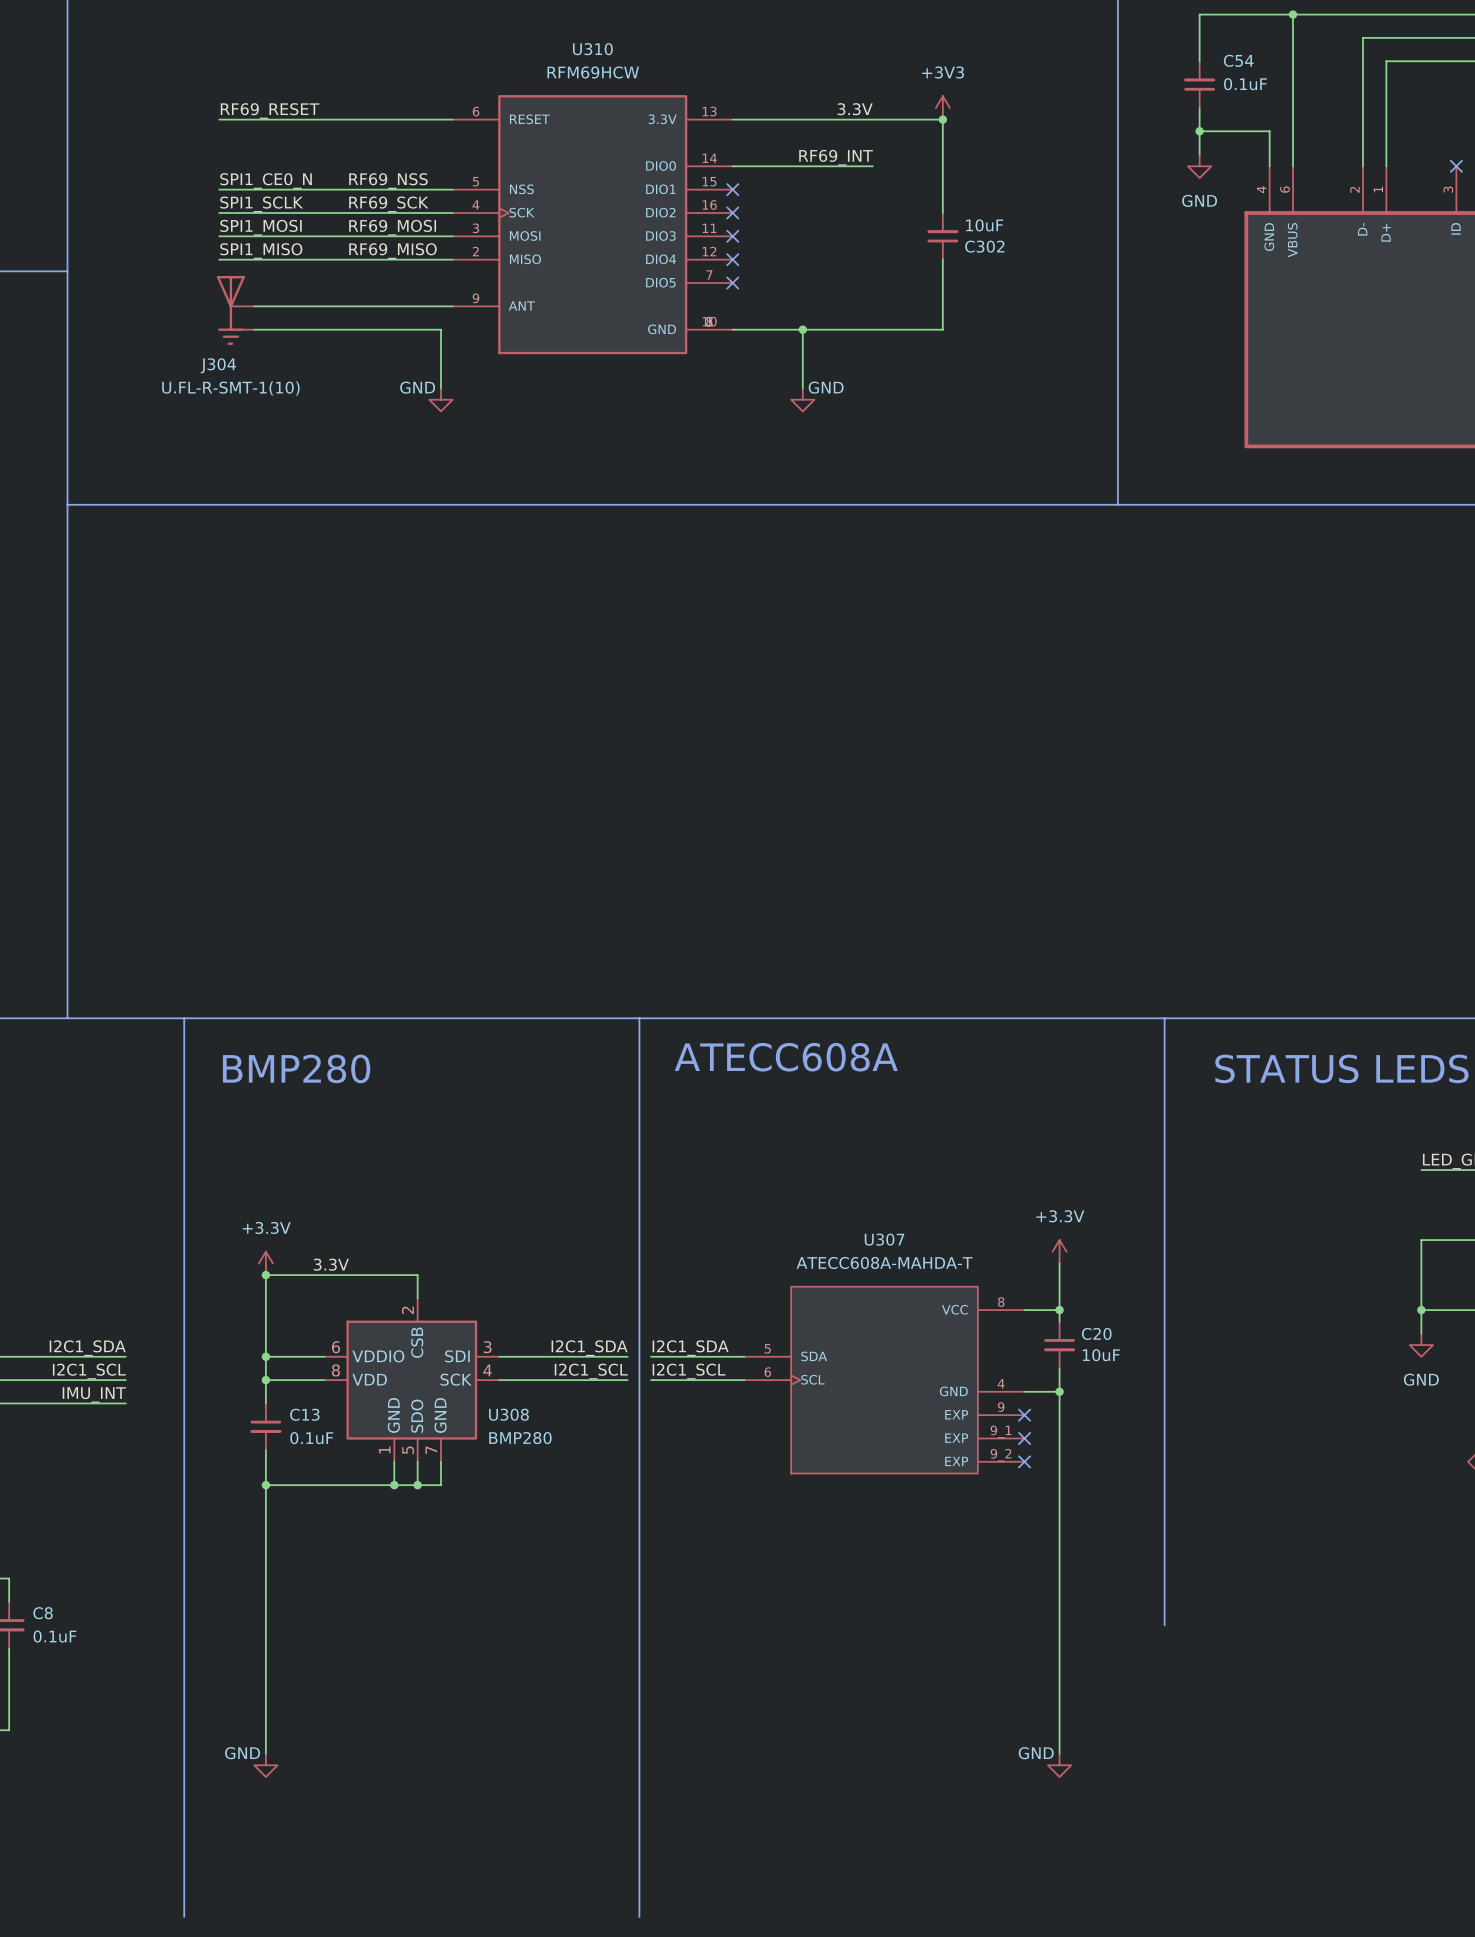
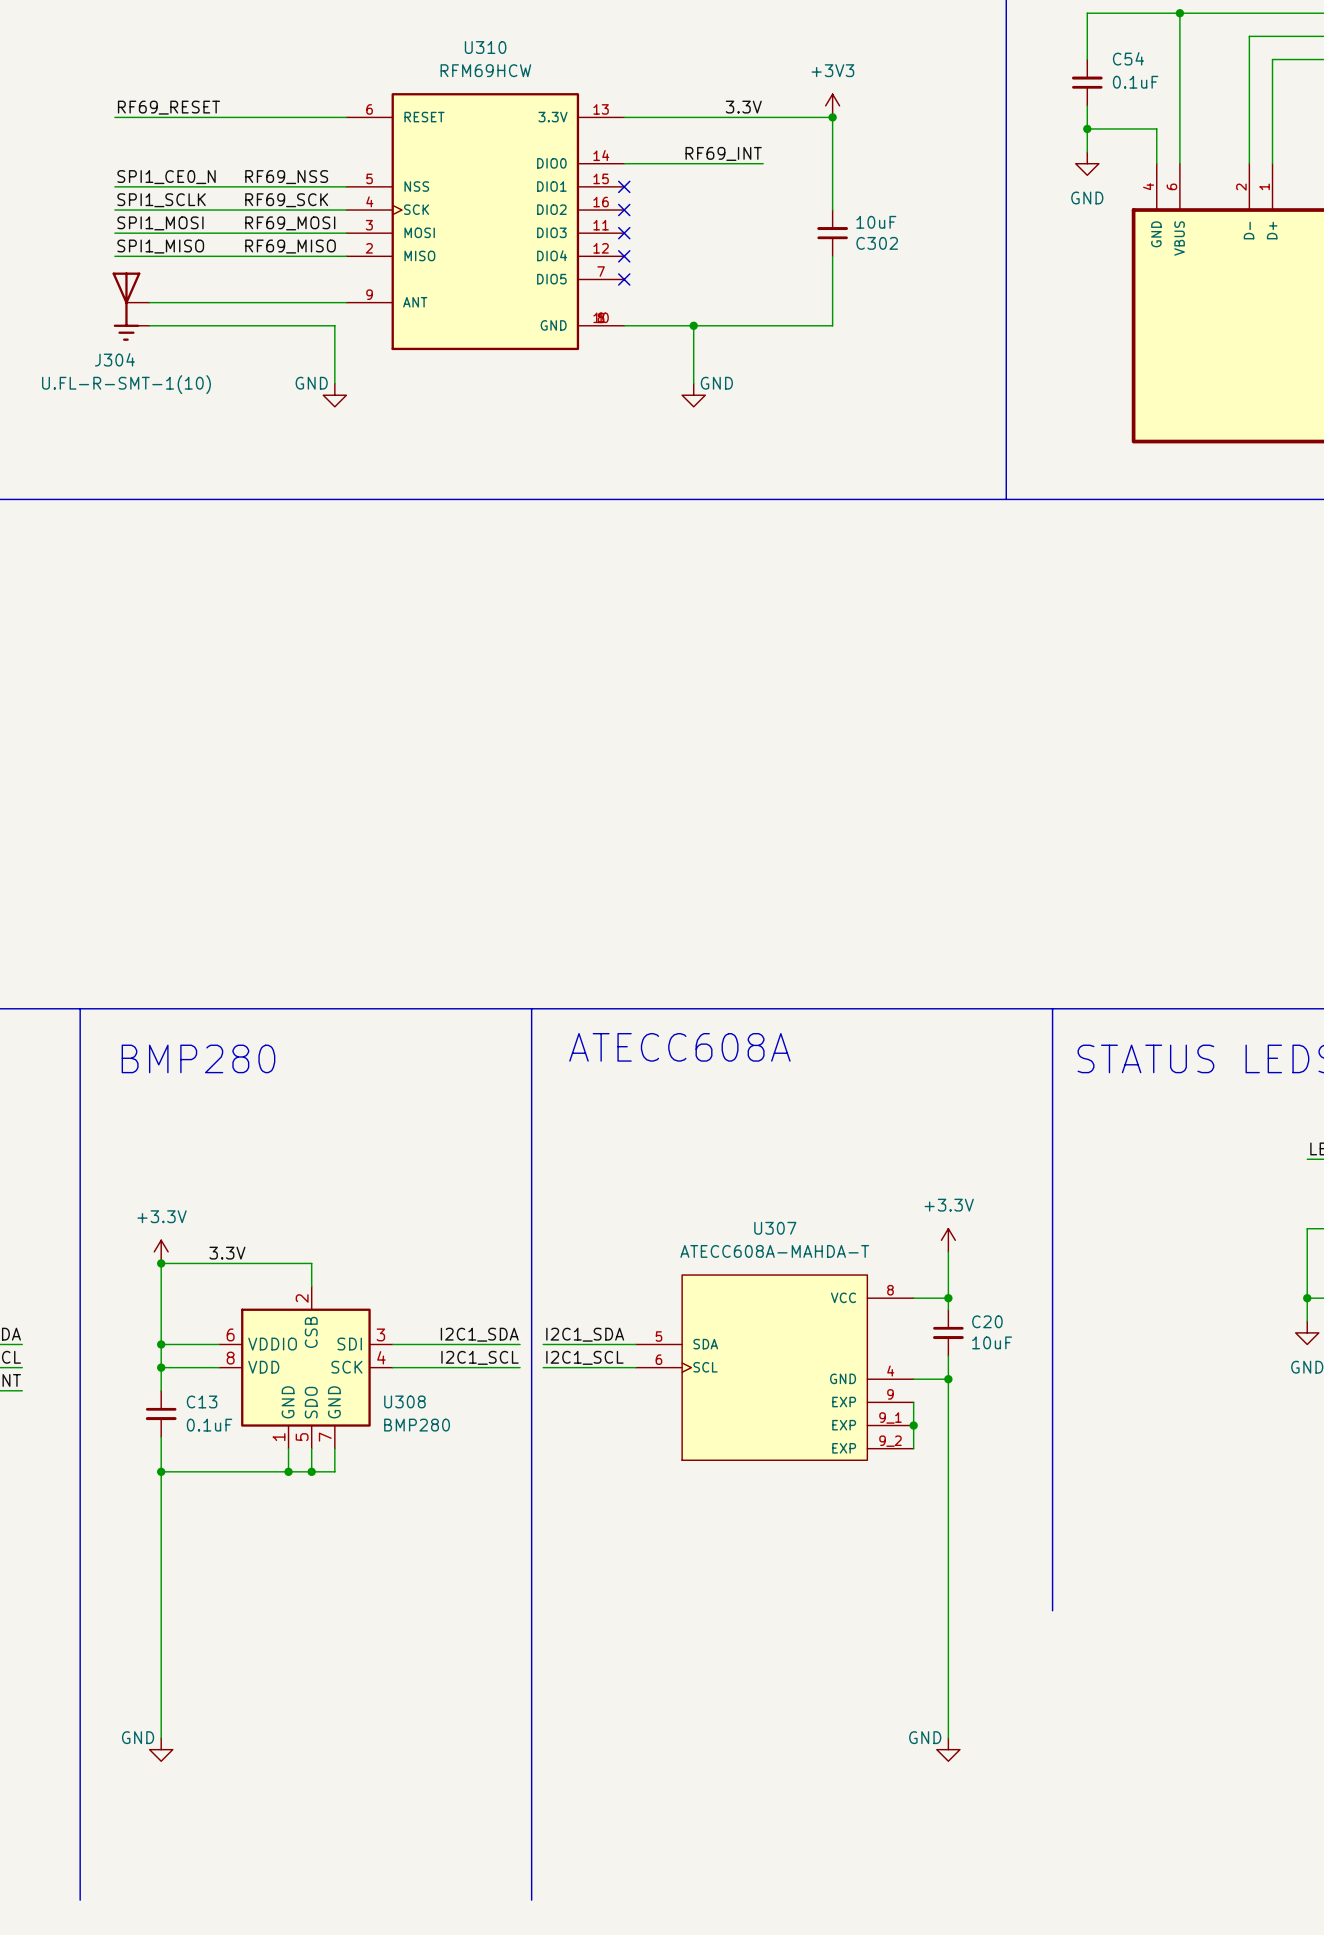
wire: none -> (913, 1402) (913, 1448)
no-connect mark: (1024, 1415) -> none
no-connect mark: (1024, 1438) -> none
junction: none -> (913, 1425)
no-connect mark: (1024, 1461) -> none

